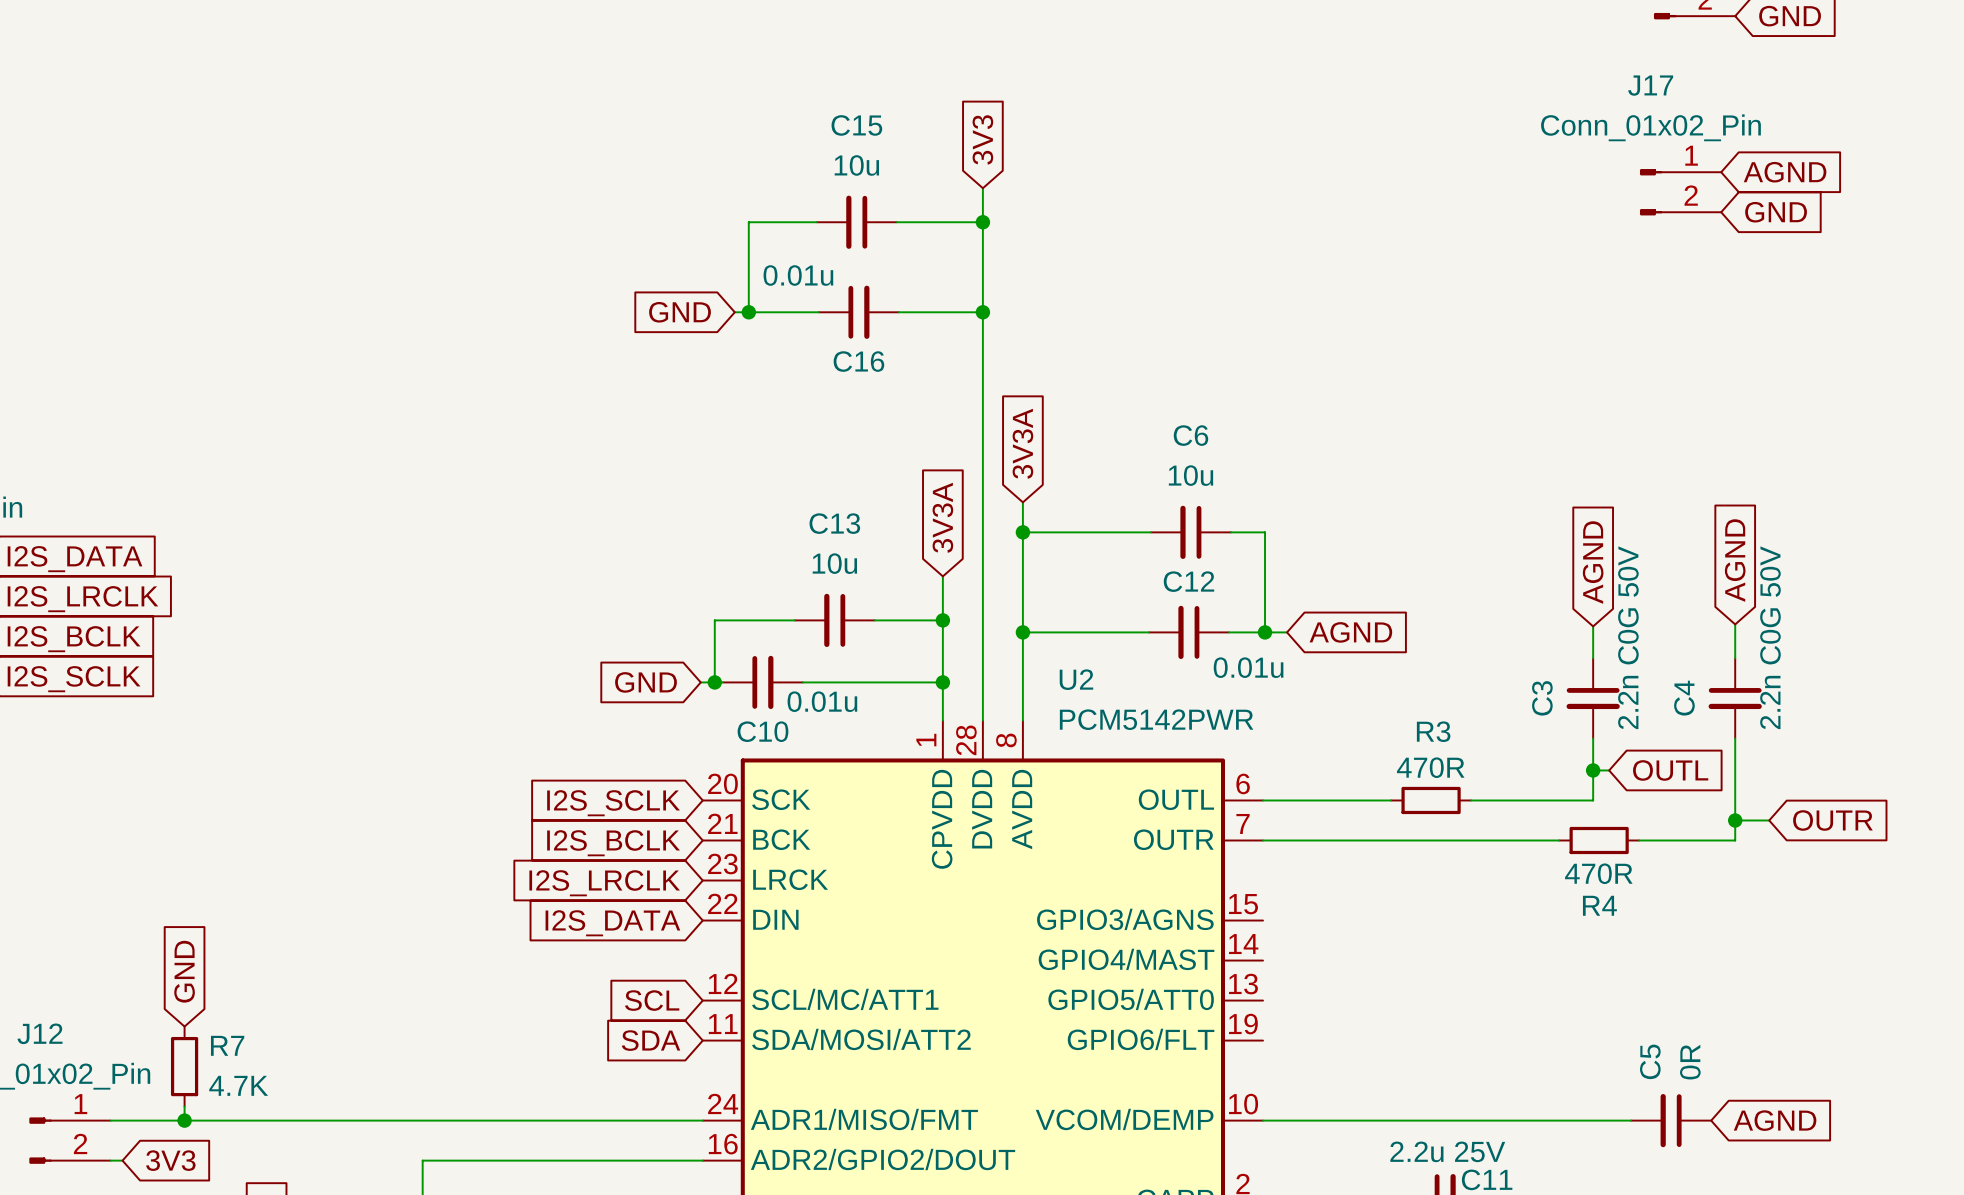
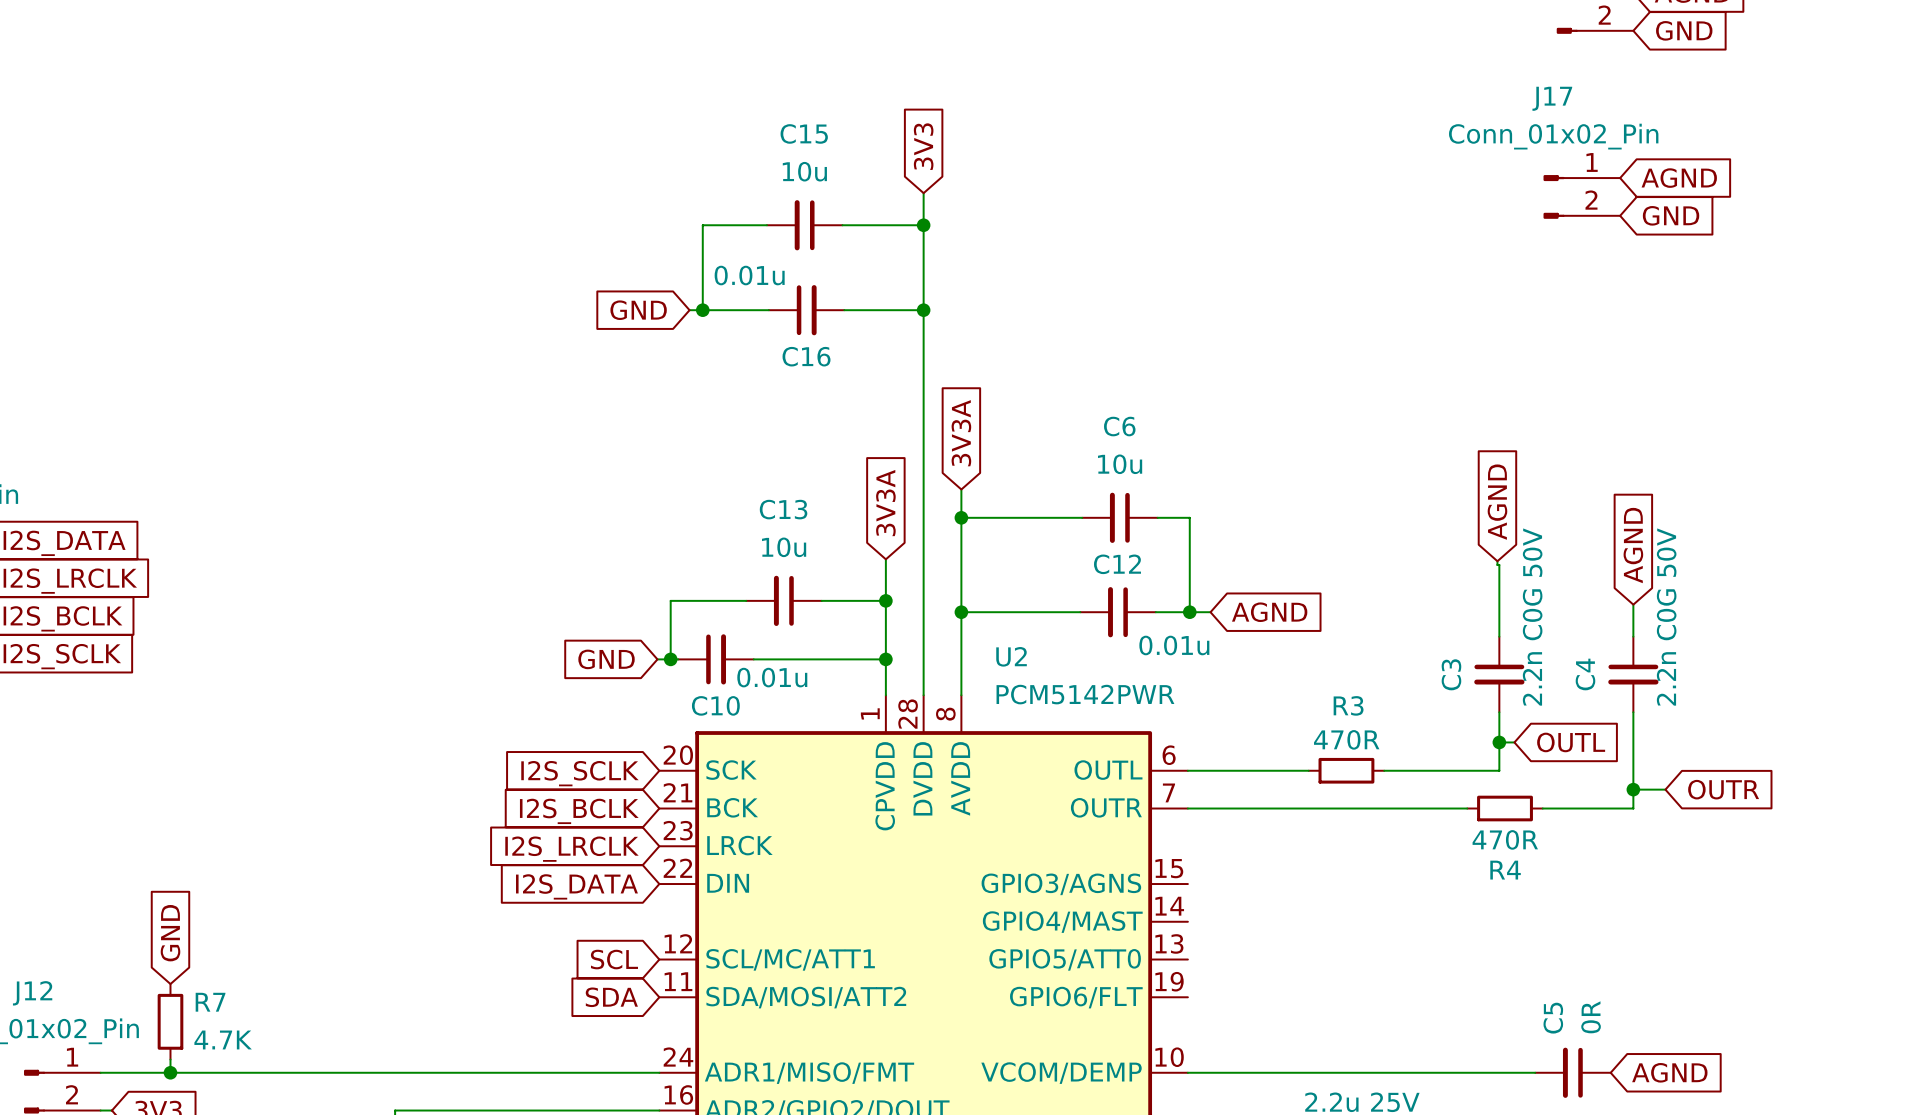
global label position: AGND (1593, 562) -> AGND (1497, 502)
wire: none -> (1497, 561) (1497, 565) (1499, 565) (1499, 606)

